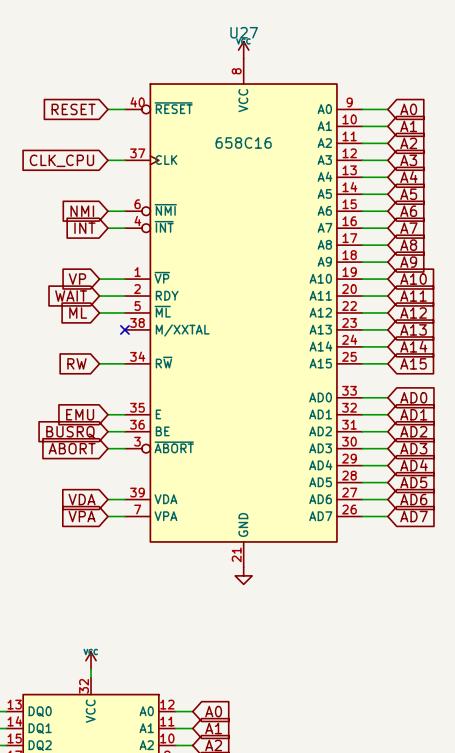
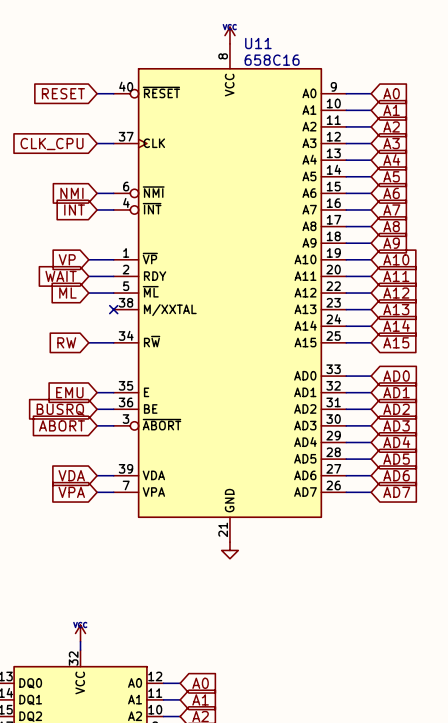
U27 name: U27 (244, 32) -> U11 (258, 43)
U27 value position: 658C16 (243, 142) -> 658C16 (272, 60)

